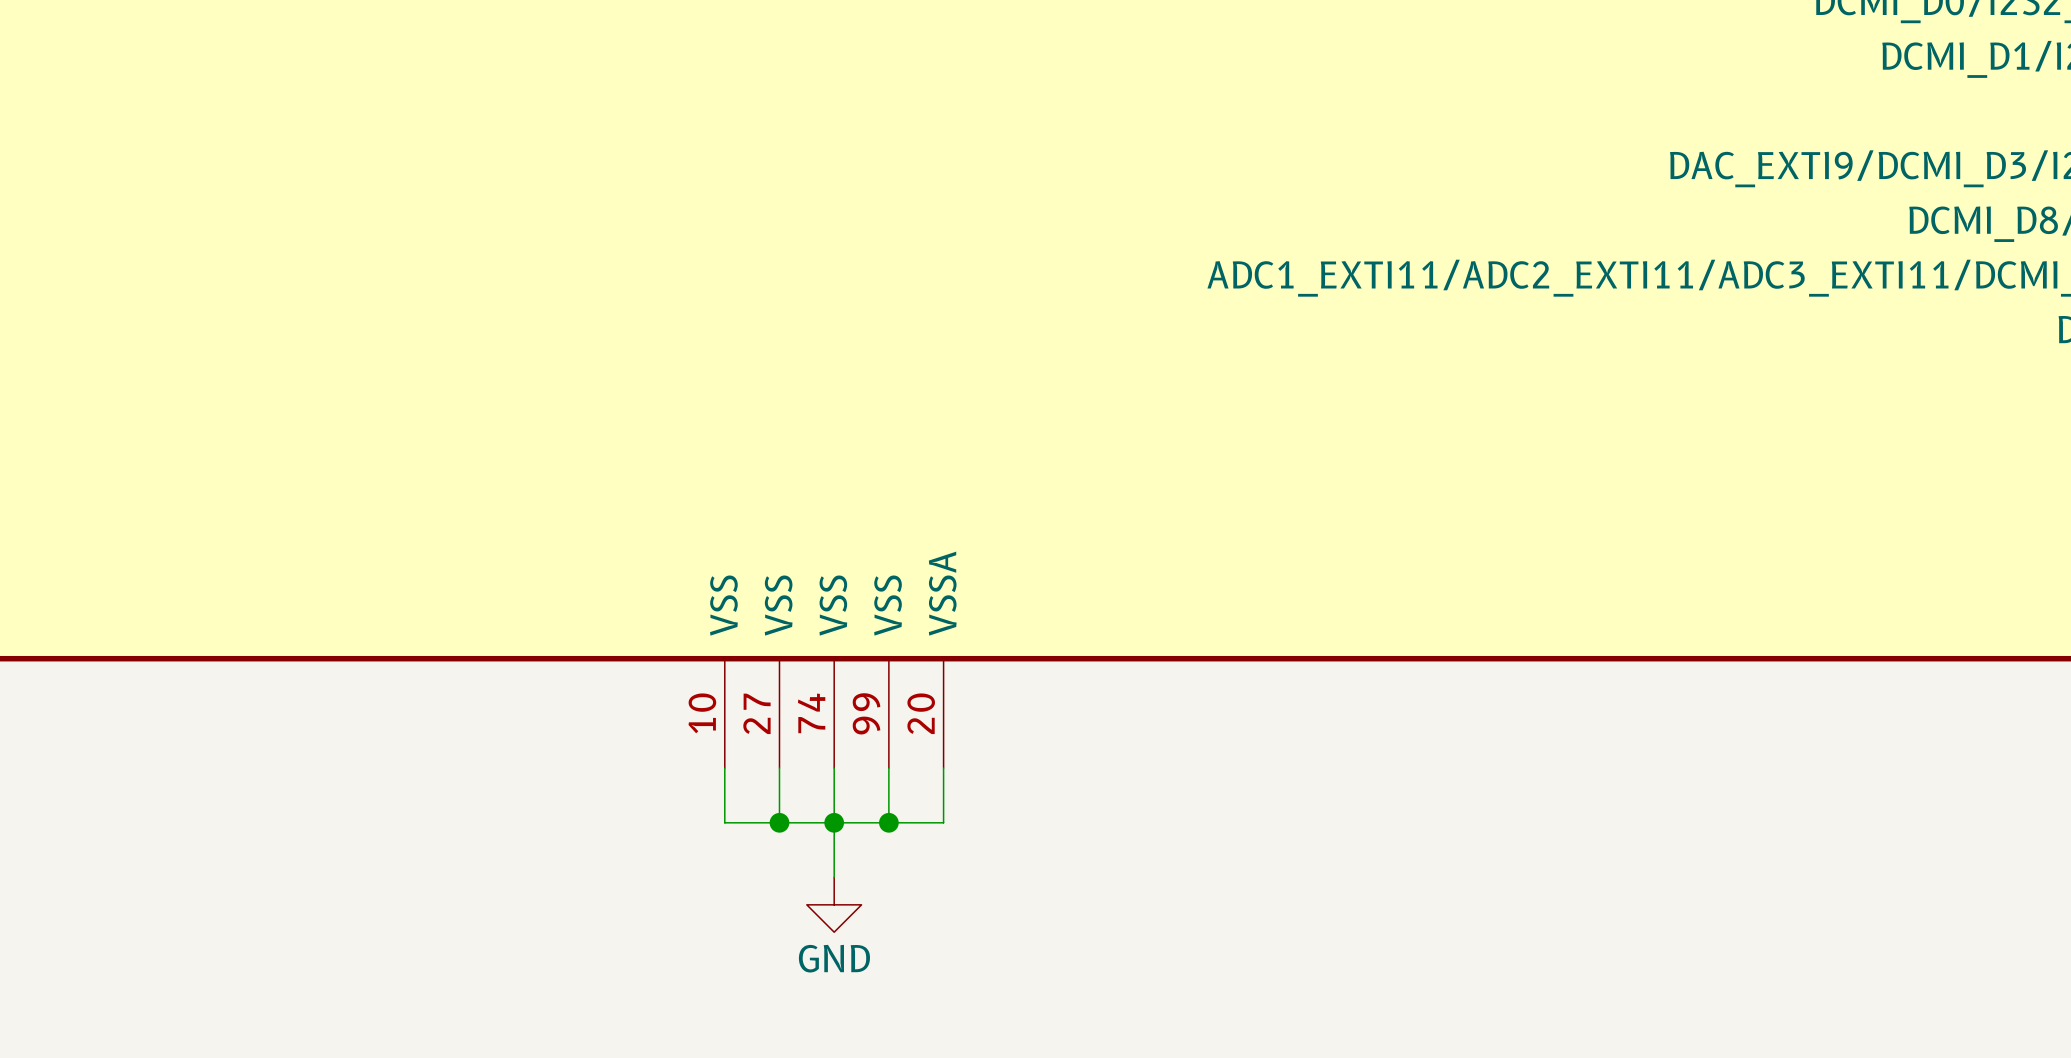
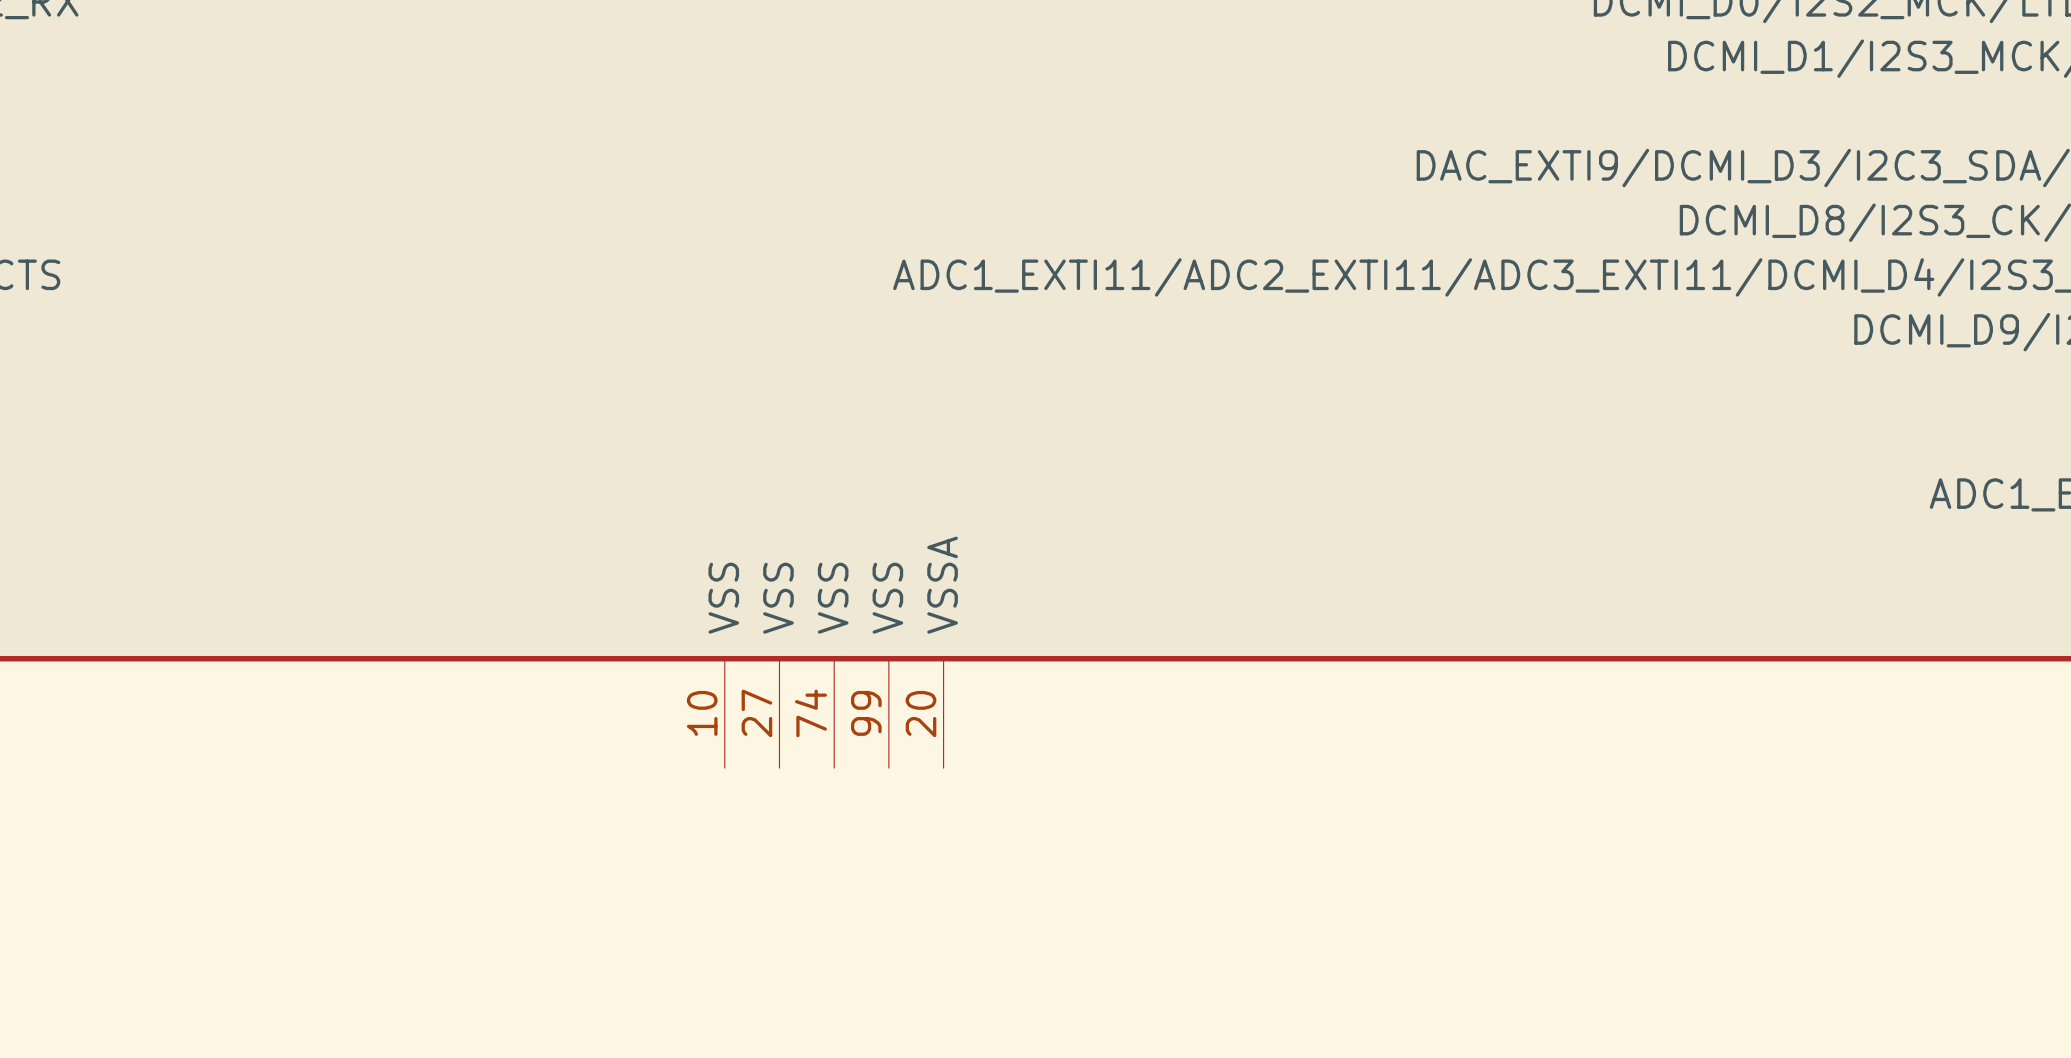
wire: (724, 768) (724, 822) (943, 822) (943, 768) -> none
wire: (779, 768) (779, 822) -> none
wire: (834, 768) (834, 877) -> none
wire: (888, 768) (888, 822) -> none
junction: (779, 822) -> none
junction: (834, 822) -> none
junction: (888, 822) -> none
power symbol: GND (834, 904) -> none

